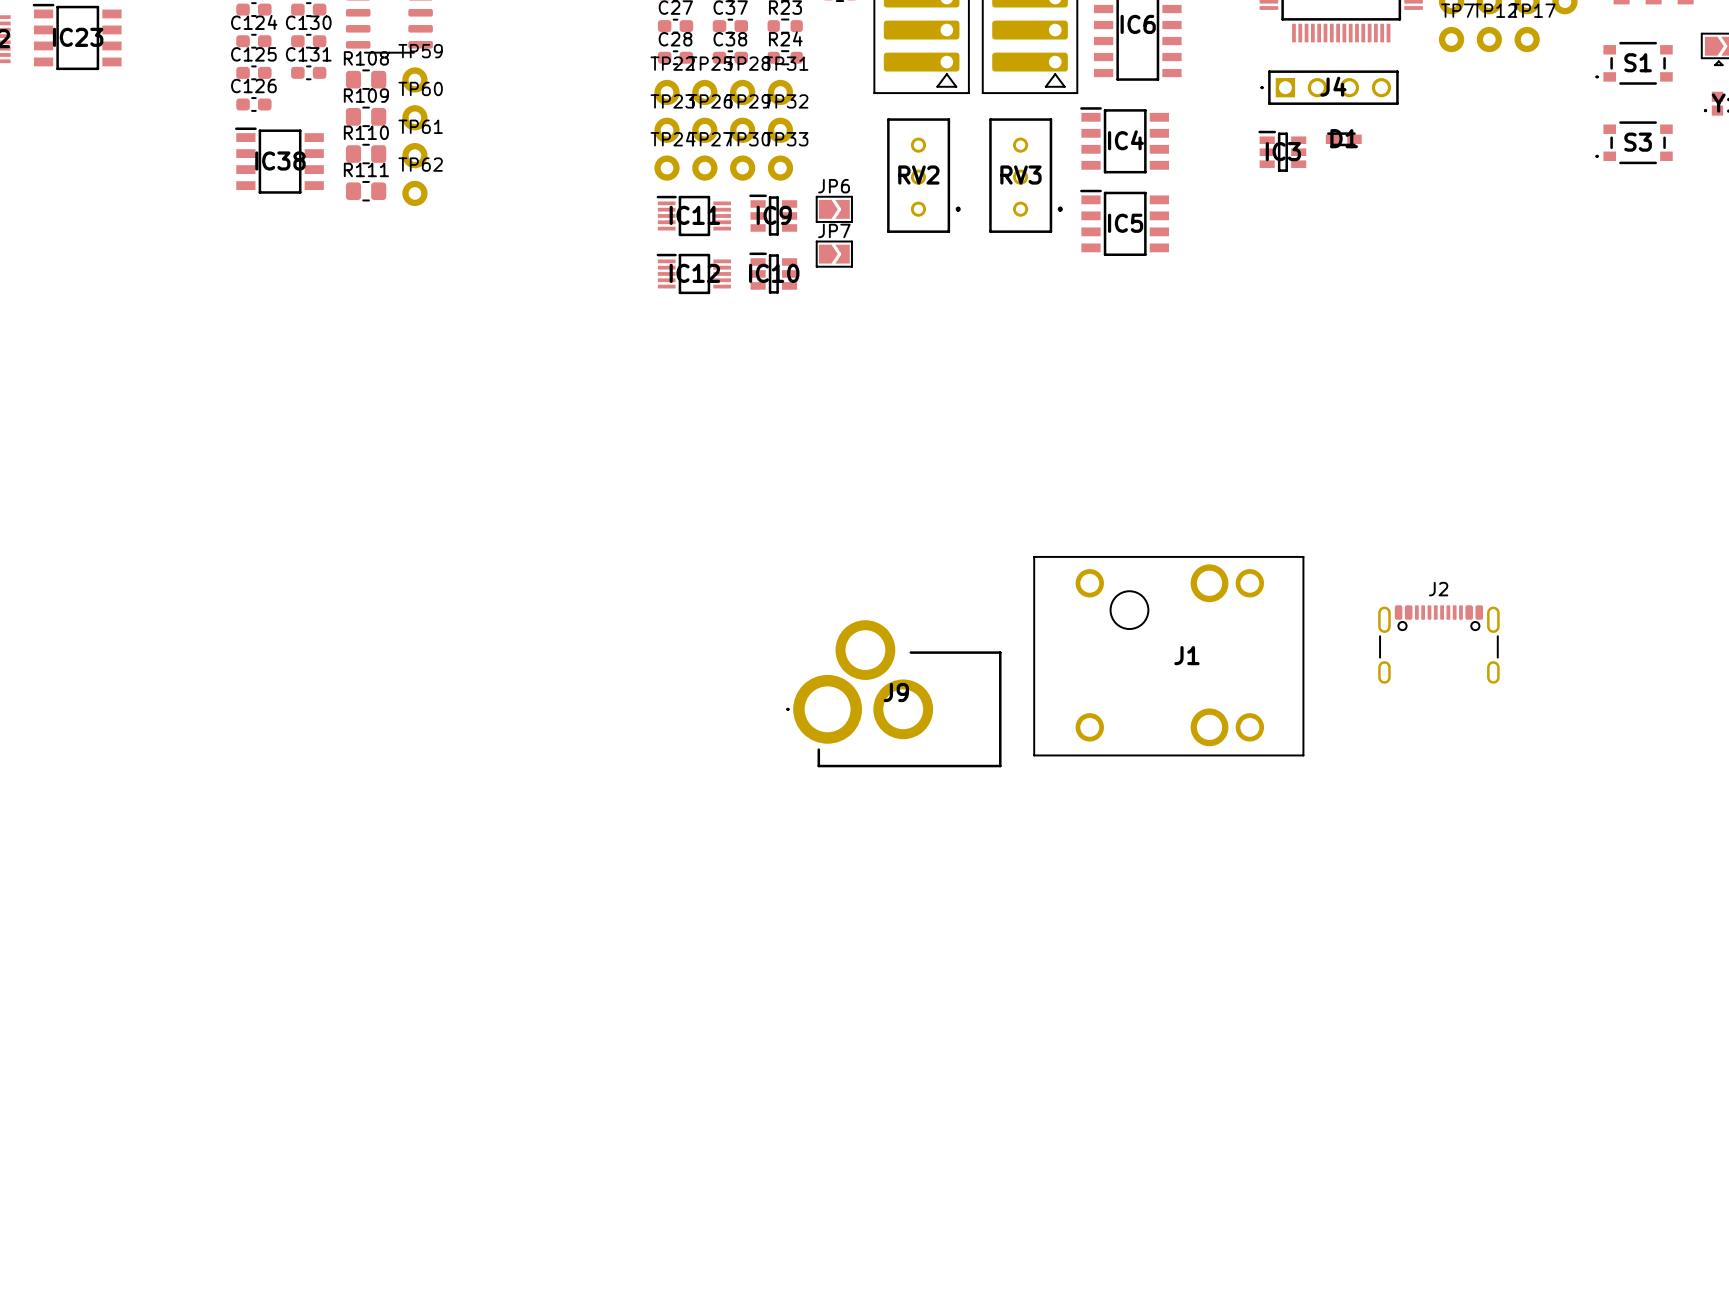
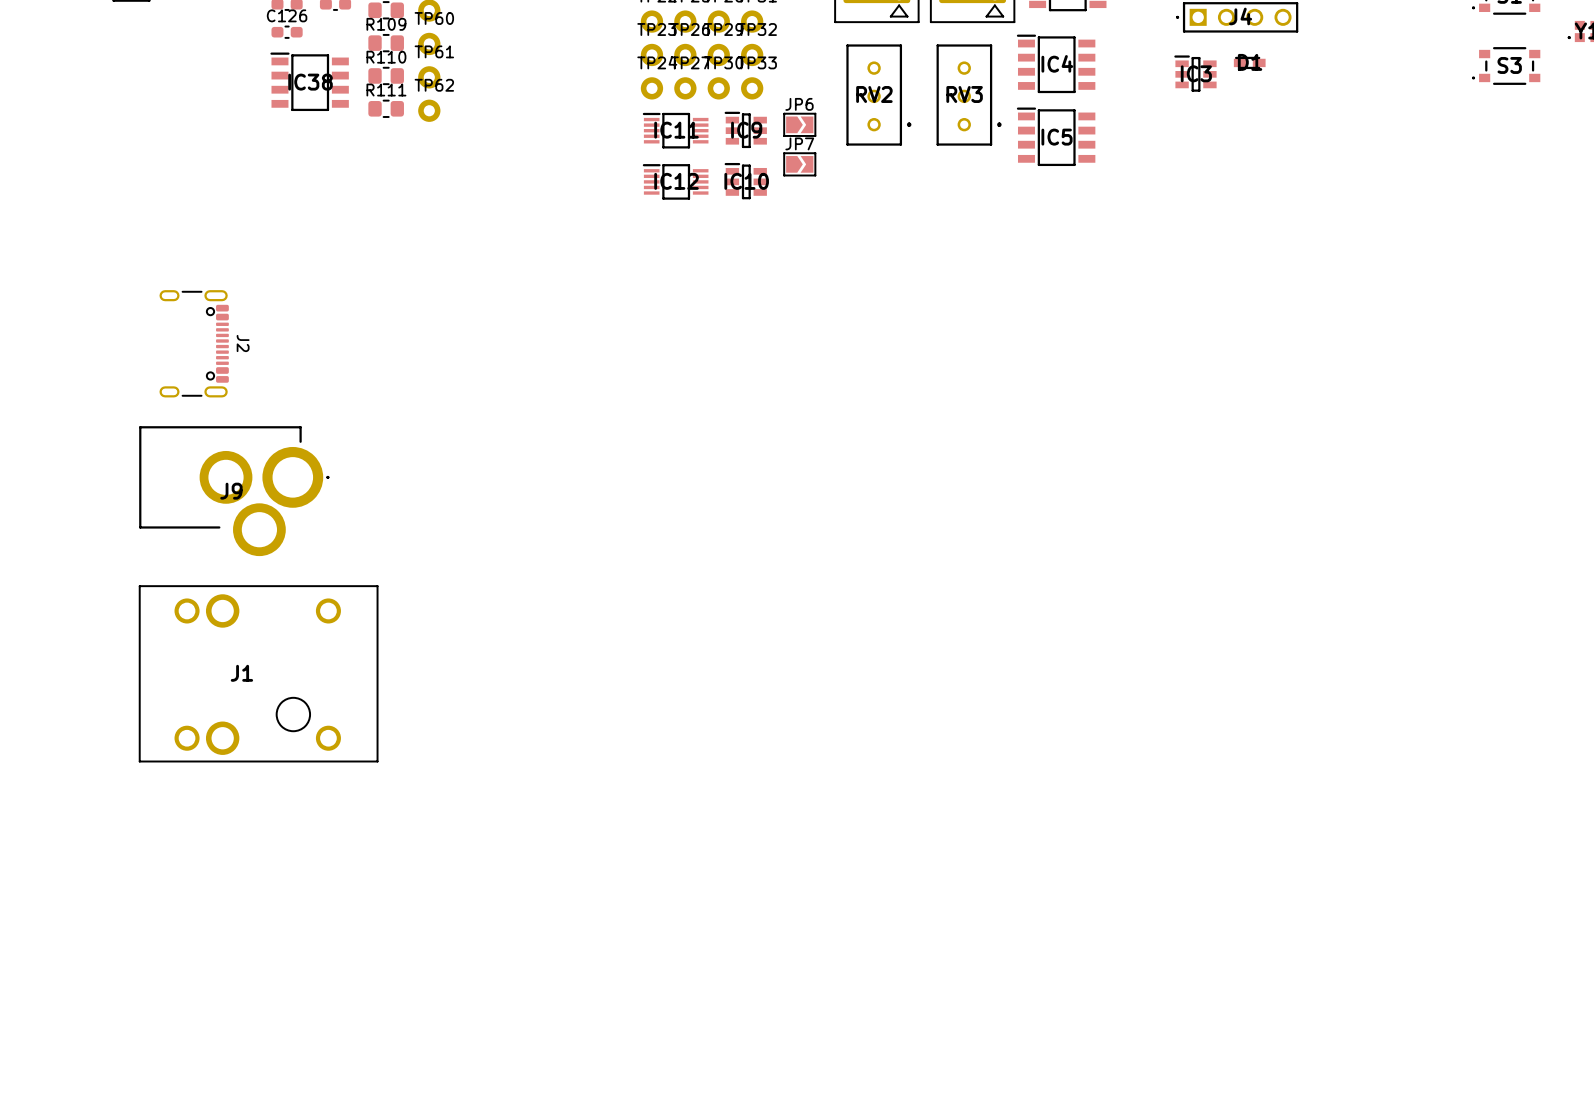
J2 rotation: 0° (1438, 644) -> 90° clockwise (194, 343)
J2 position: (1438, 644) -> (194, 343)
J1 rotation: 0° (1168, 656) -> 180° (258, 673)
J1 position: (1168, 656) -> (258, 673)
J9 rotation: 0° (894, 693) -> 180° (234, 491)
J9 position: (894, 693) -> (234, 491)

